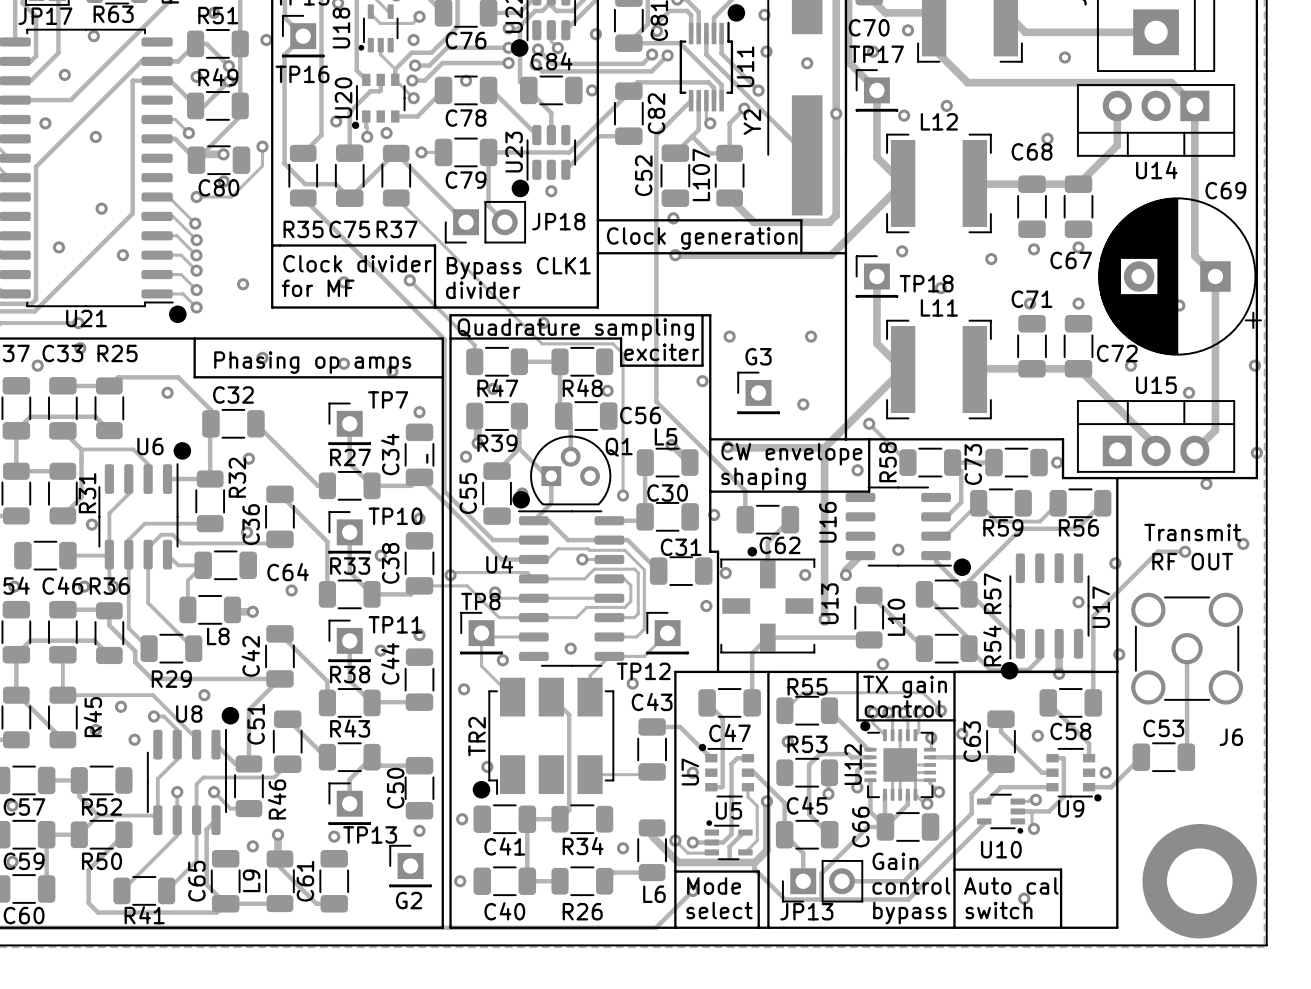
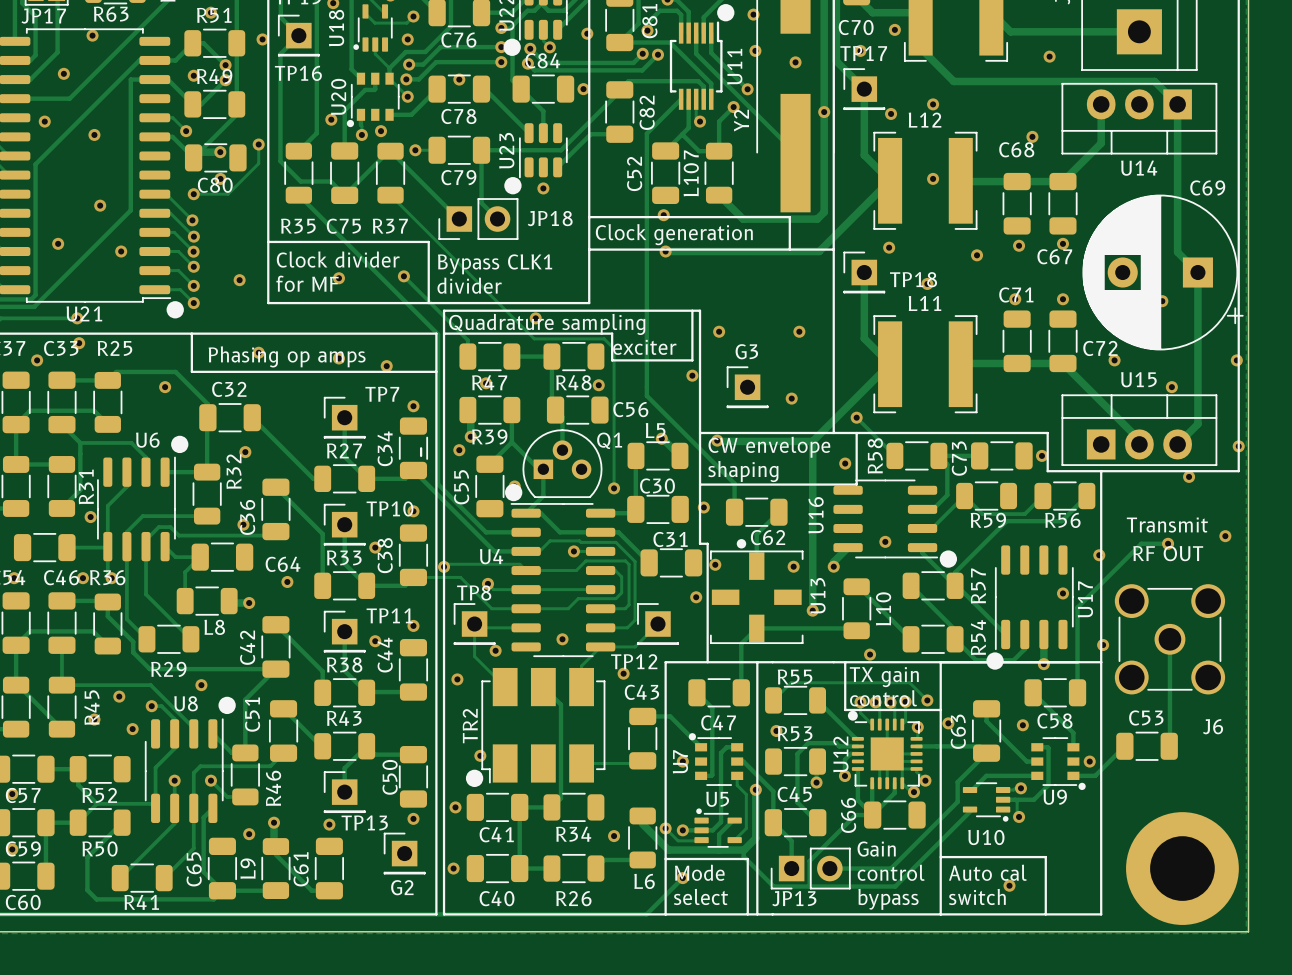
via: none -> (933, 178)

